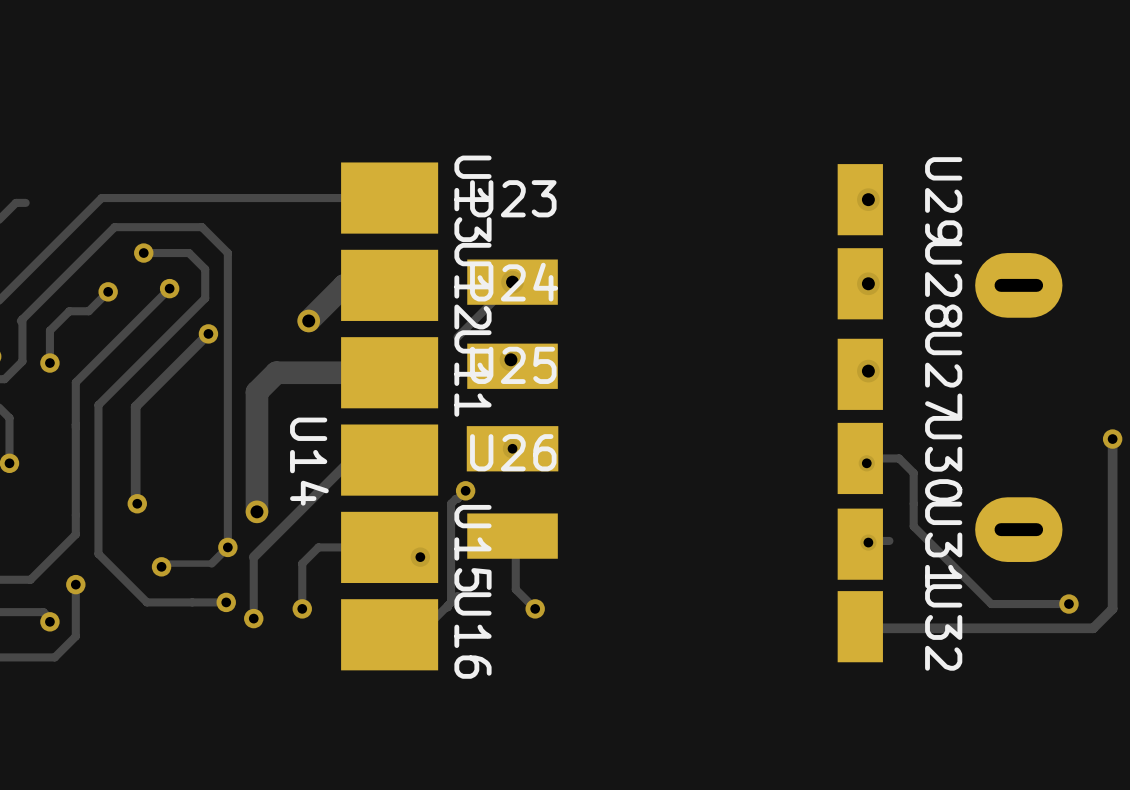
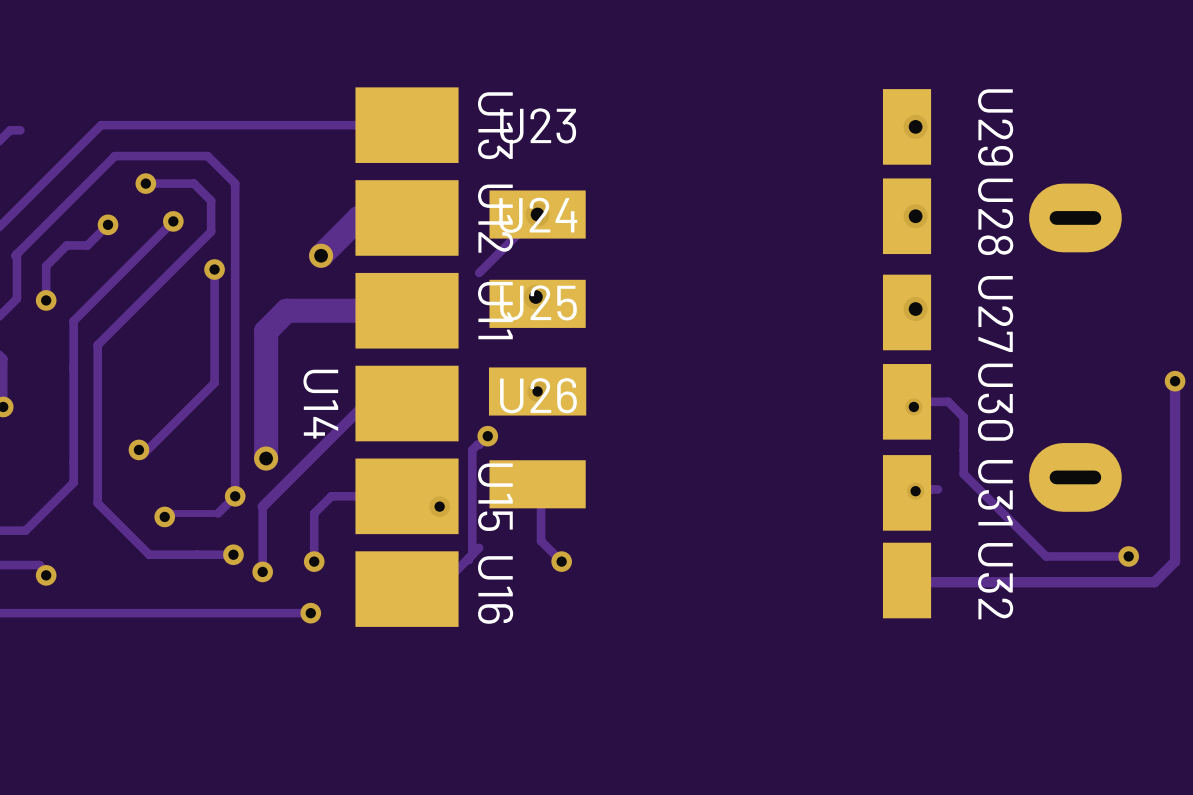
track: (208, 333) (135, 406) (135, 502) (137, 503) -> (214, 269) (214, 382) (142, 455)
track: (75, 584) (75, 636) (54, 657) -> (310, 613) (51, 613)
via: (75, 584) -> none
via: none -> (310, 613)

